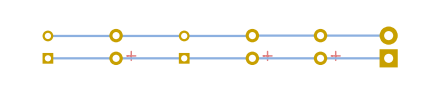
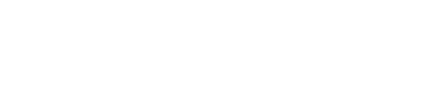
bottom track: (388, 35) (47, 35) -> none
part: (122, 46) -> none
part: (259, 46) -> none
part: (327, 46) -> none
part: (388, 46) -> none
part: (47, 47) -> none
part: (184, 47) -> none
bottom track: (388, 58) (47, 58) -> none

